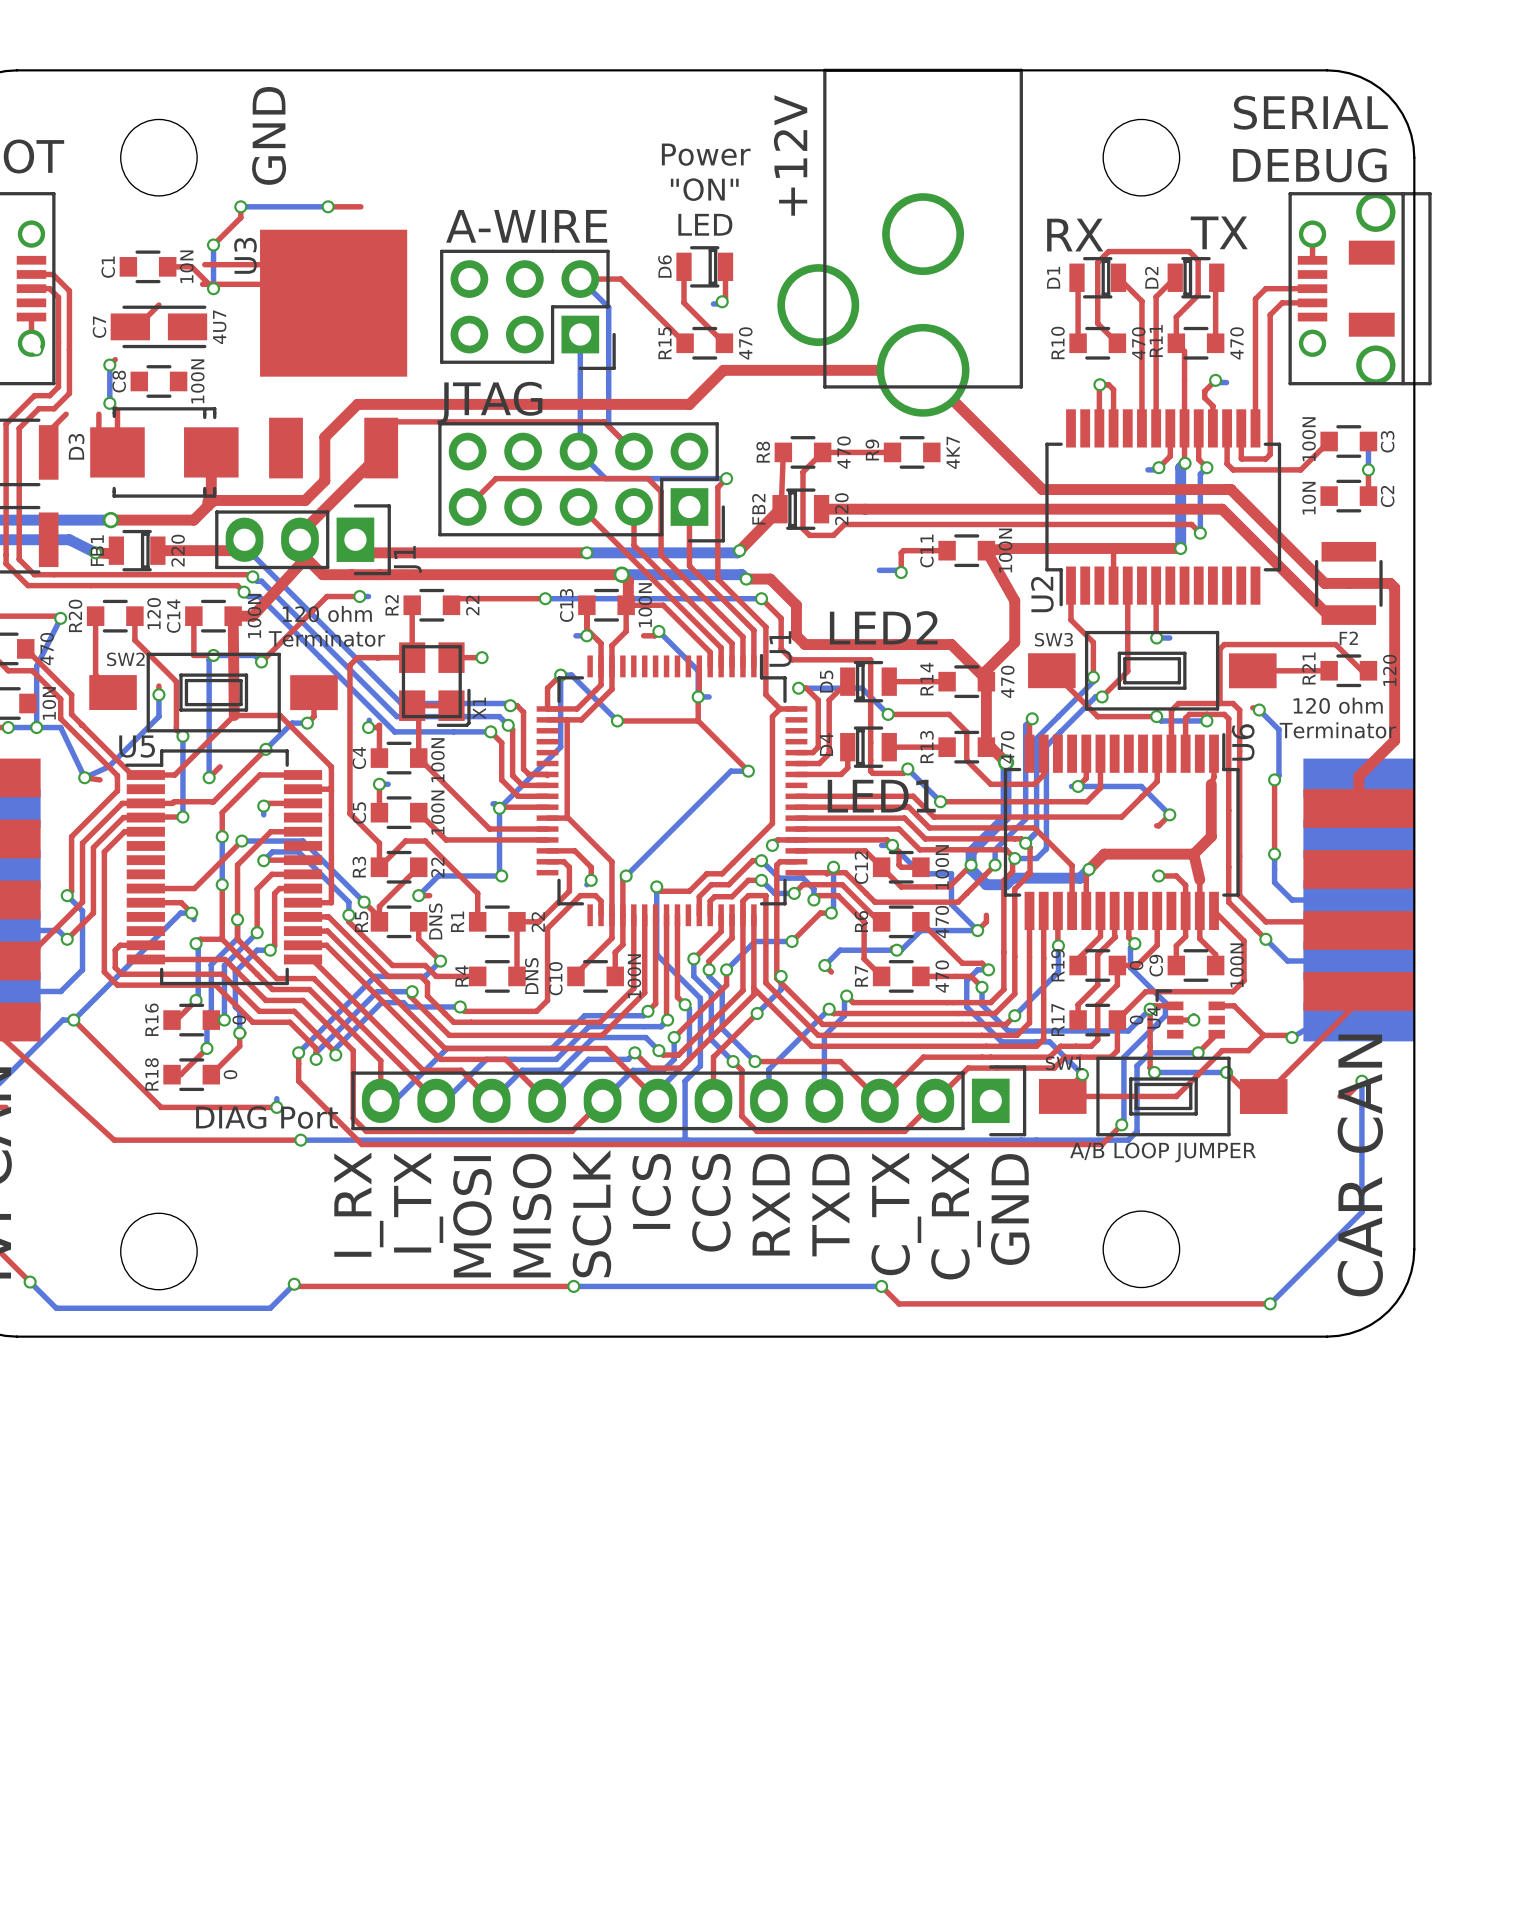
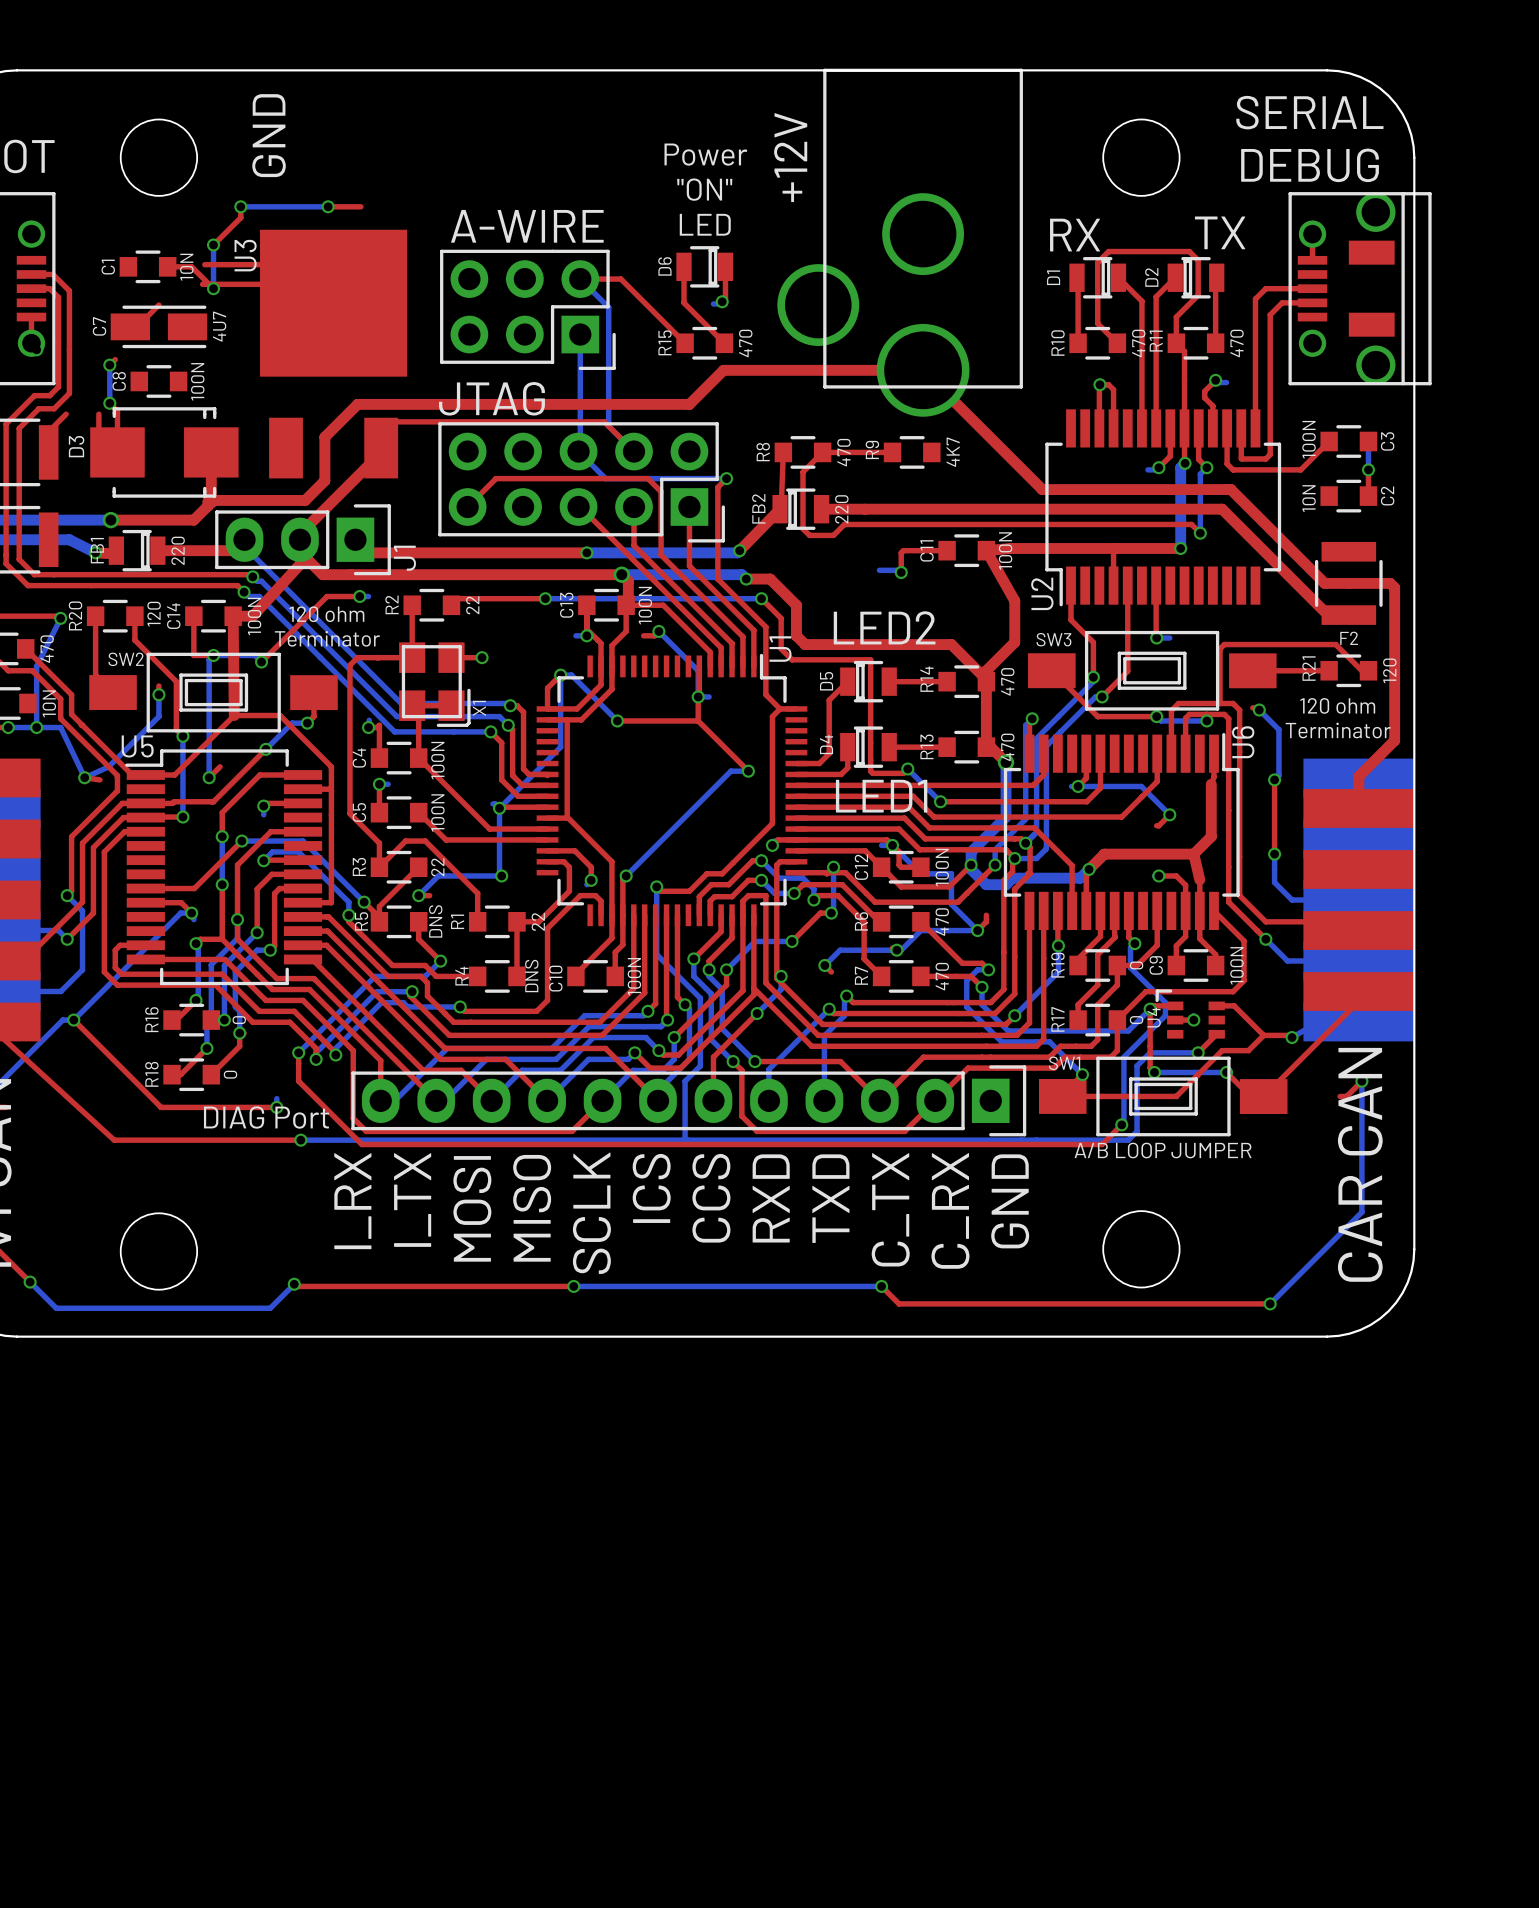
top track: (798, 688) (806, 688) (818, 700) (818, 747) (812, 752) (796, 752) -> none
bottom track: (798, 688) (861, 688) (888, 714) -> none
via: (798, 688) -> none
top track: (888, 714) (949, 714) (966, 731) (966, 760) (990, 784) (1034, 784) -> (796, 785) (1034, 784)
via: (888, 714) -> none

